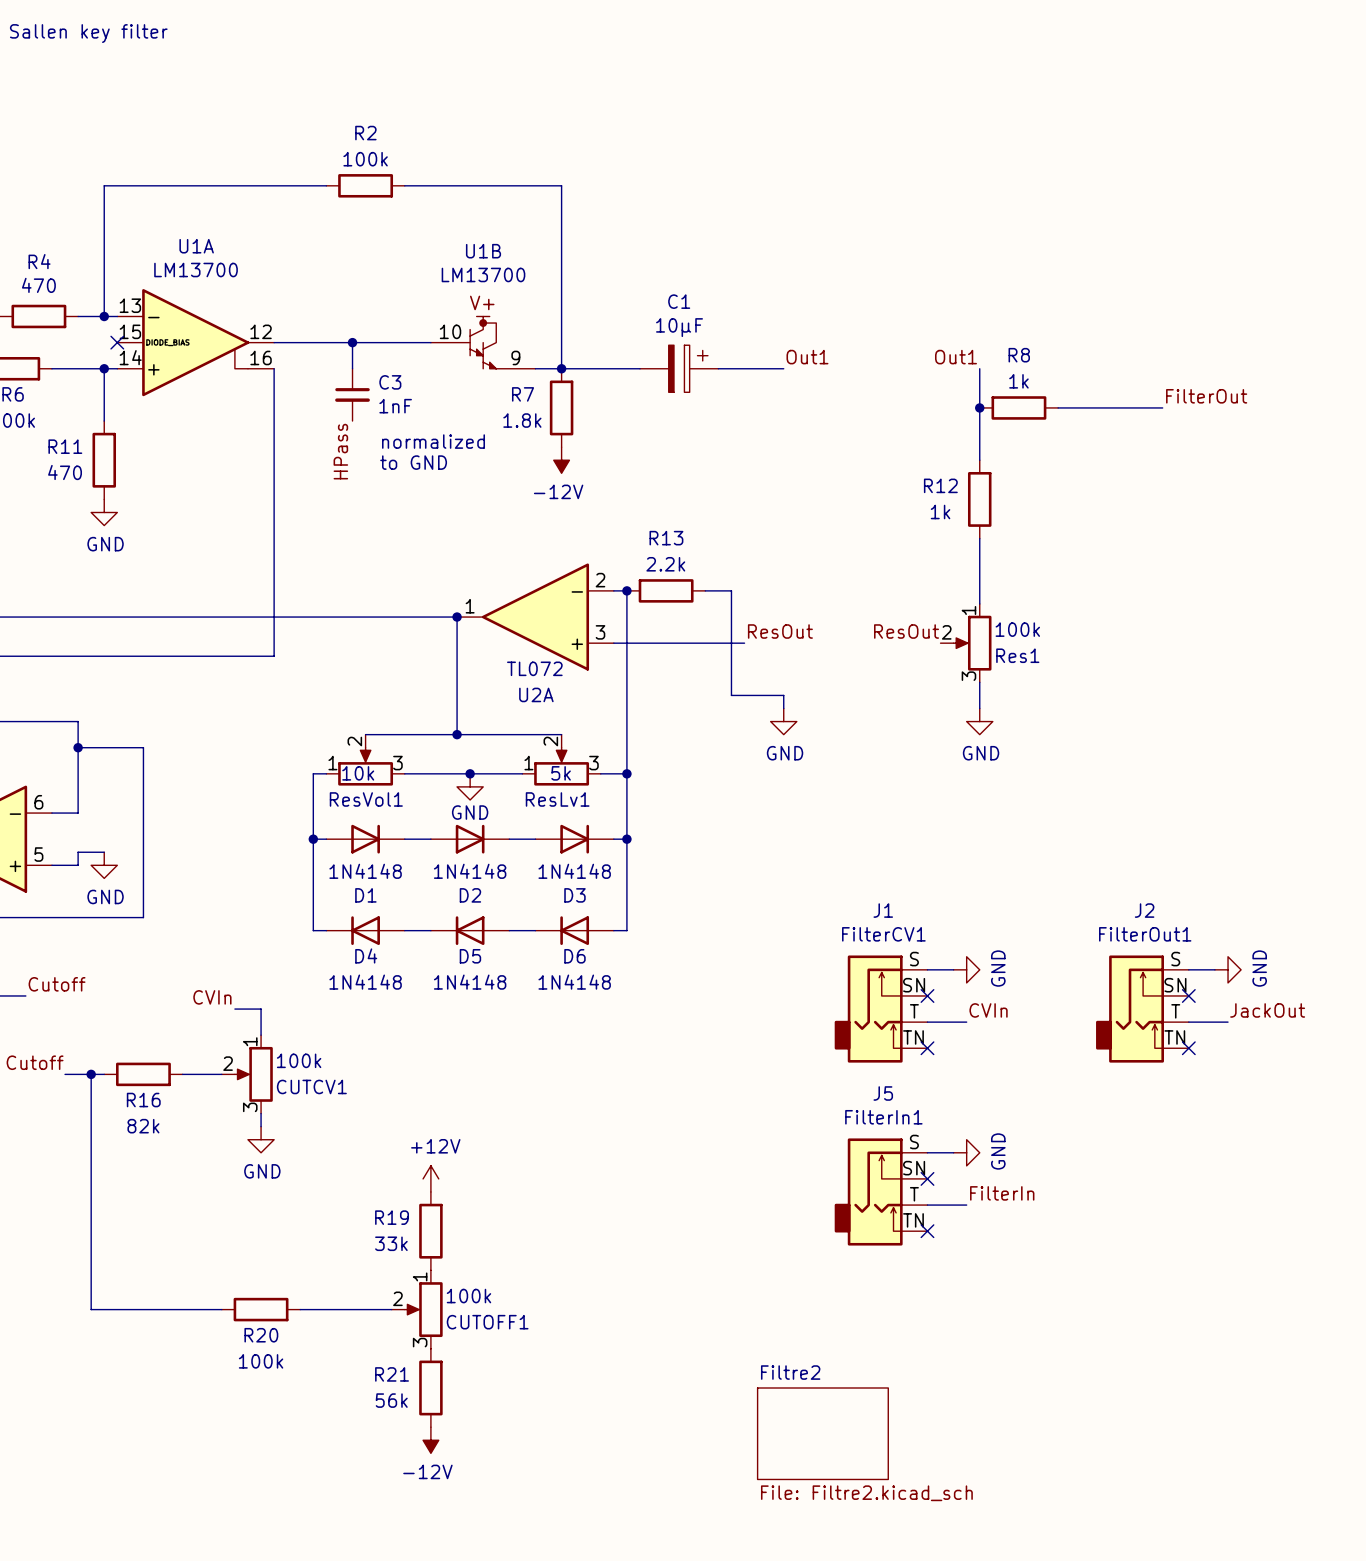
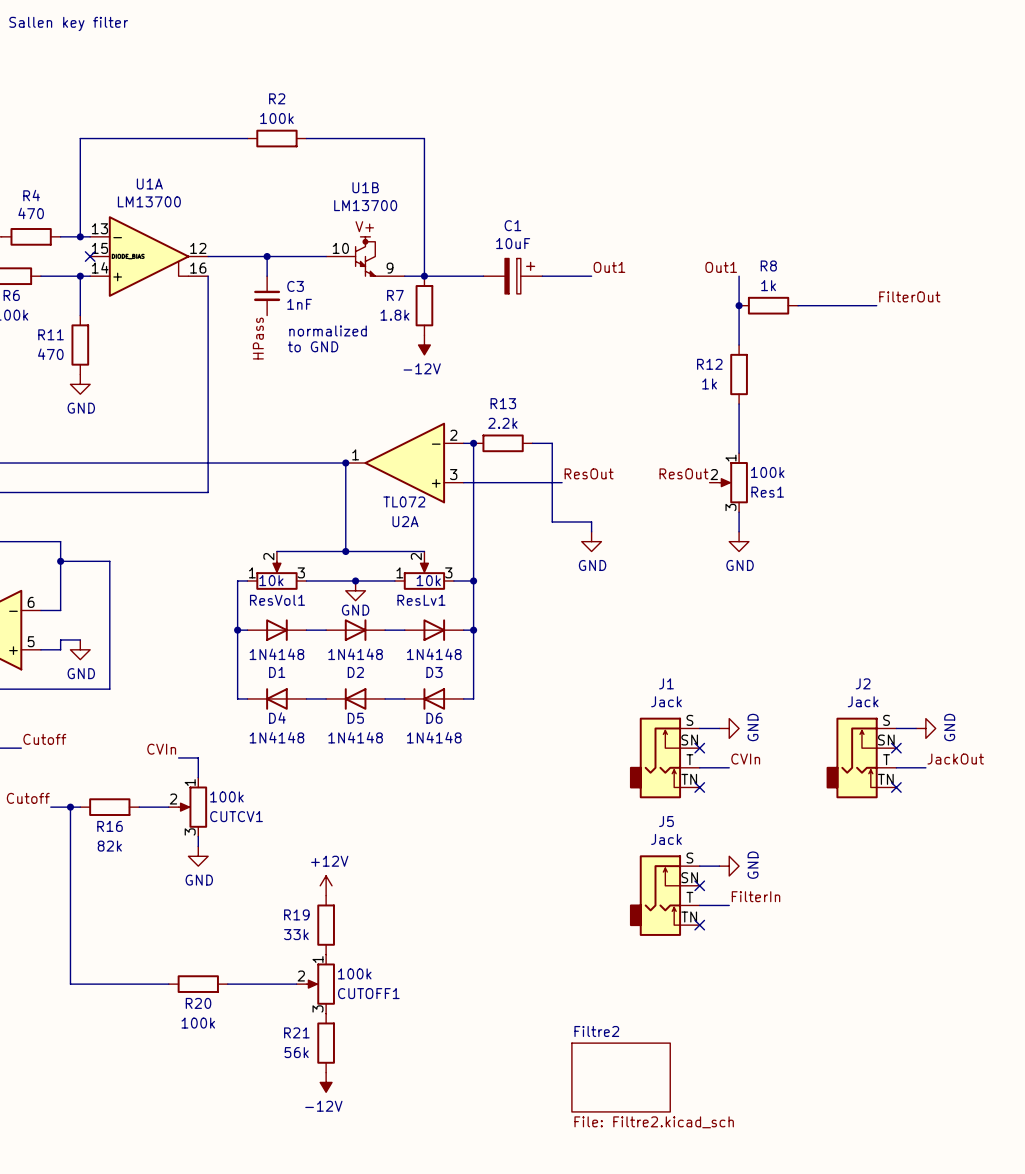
C1 value: 10µF (679, 327) -> 10uF (513, 243)
ResLv1 value: 5k (561, 773) -> 10k (428, 580)
J1 value: FilterCV1 (883, 934) -> Jack (666, 701)
J2 value: FilterOut1 (1145, 934) -> Jack (863, 701)
J5 value: FilterIn1 (883, 1117) -> Jack (666, 839)

